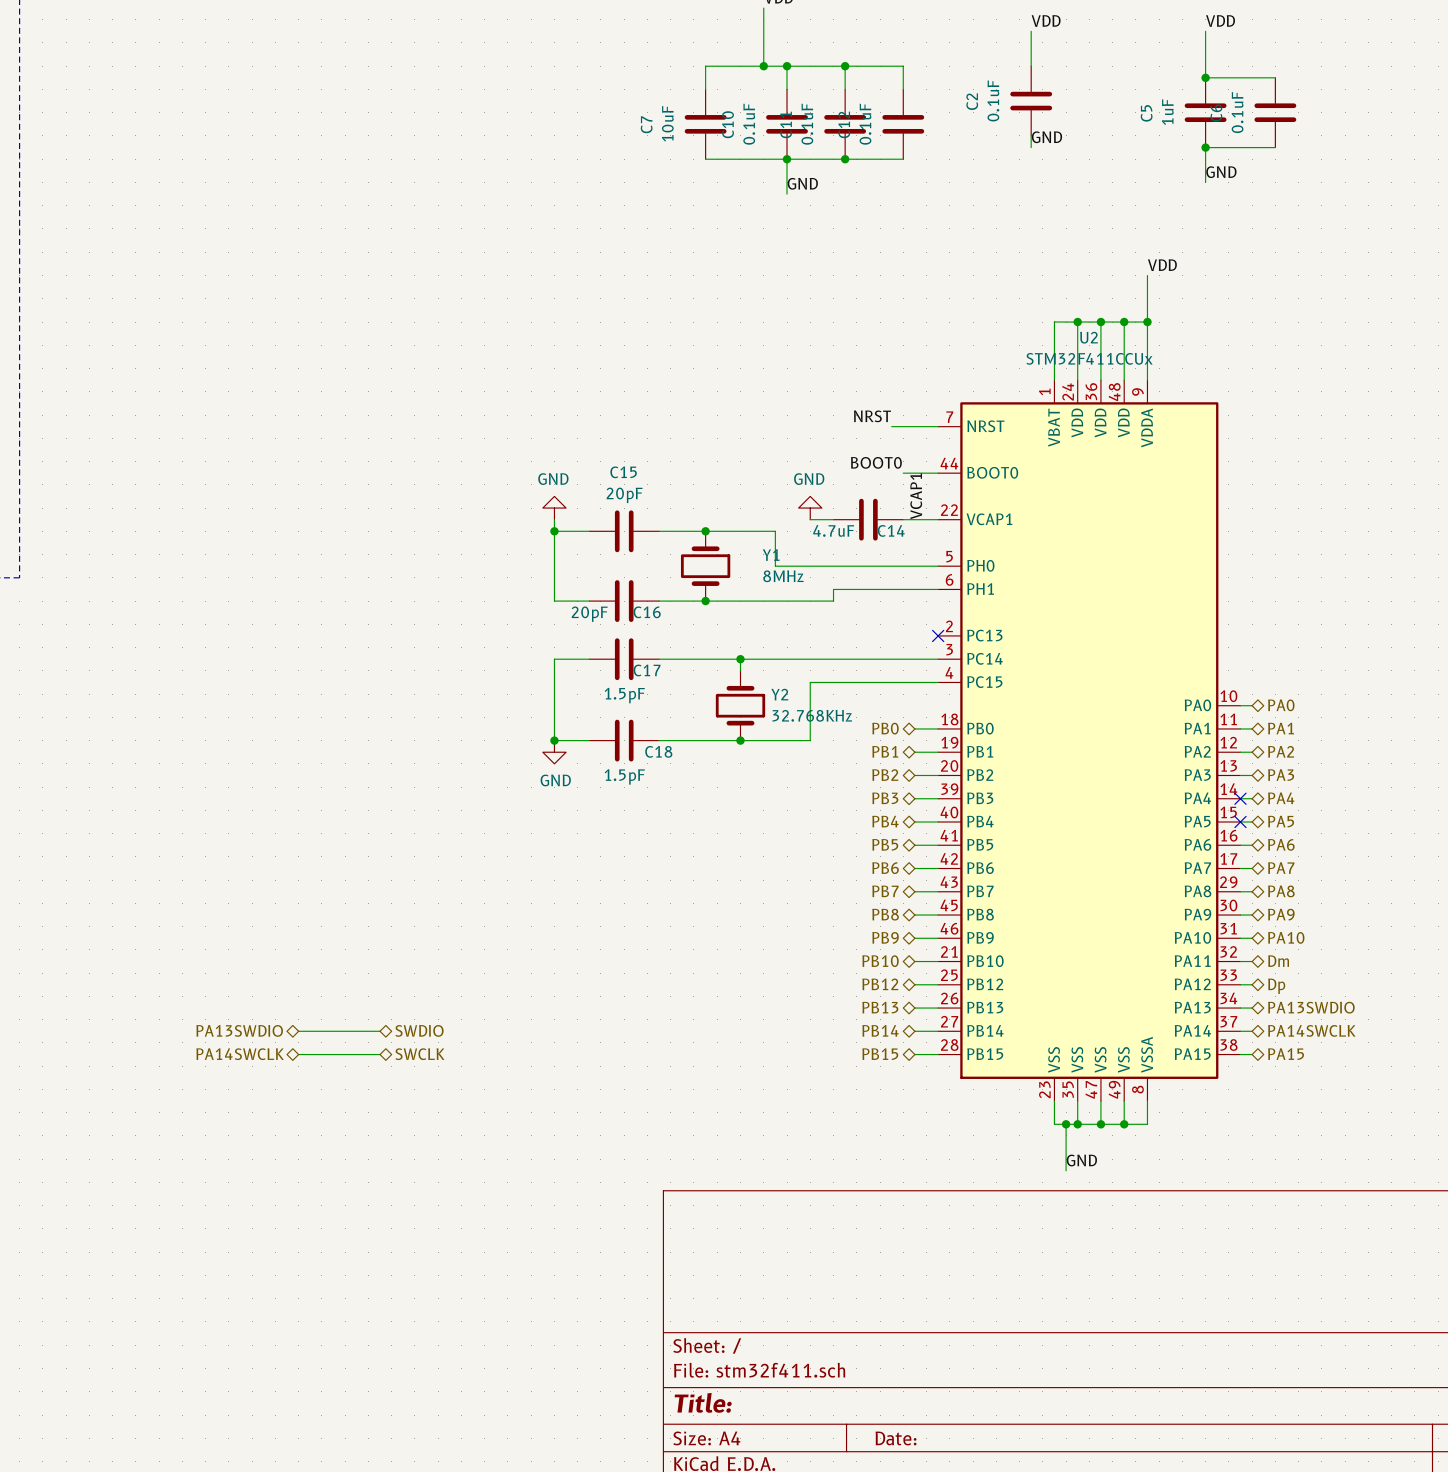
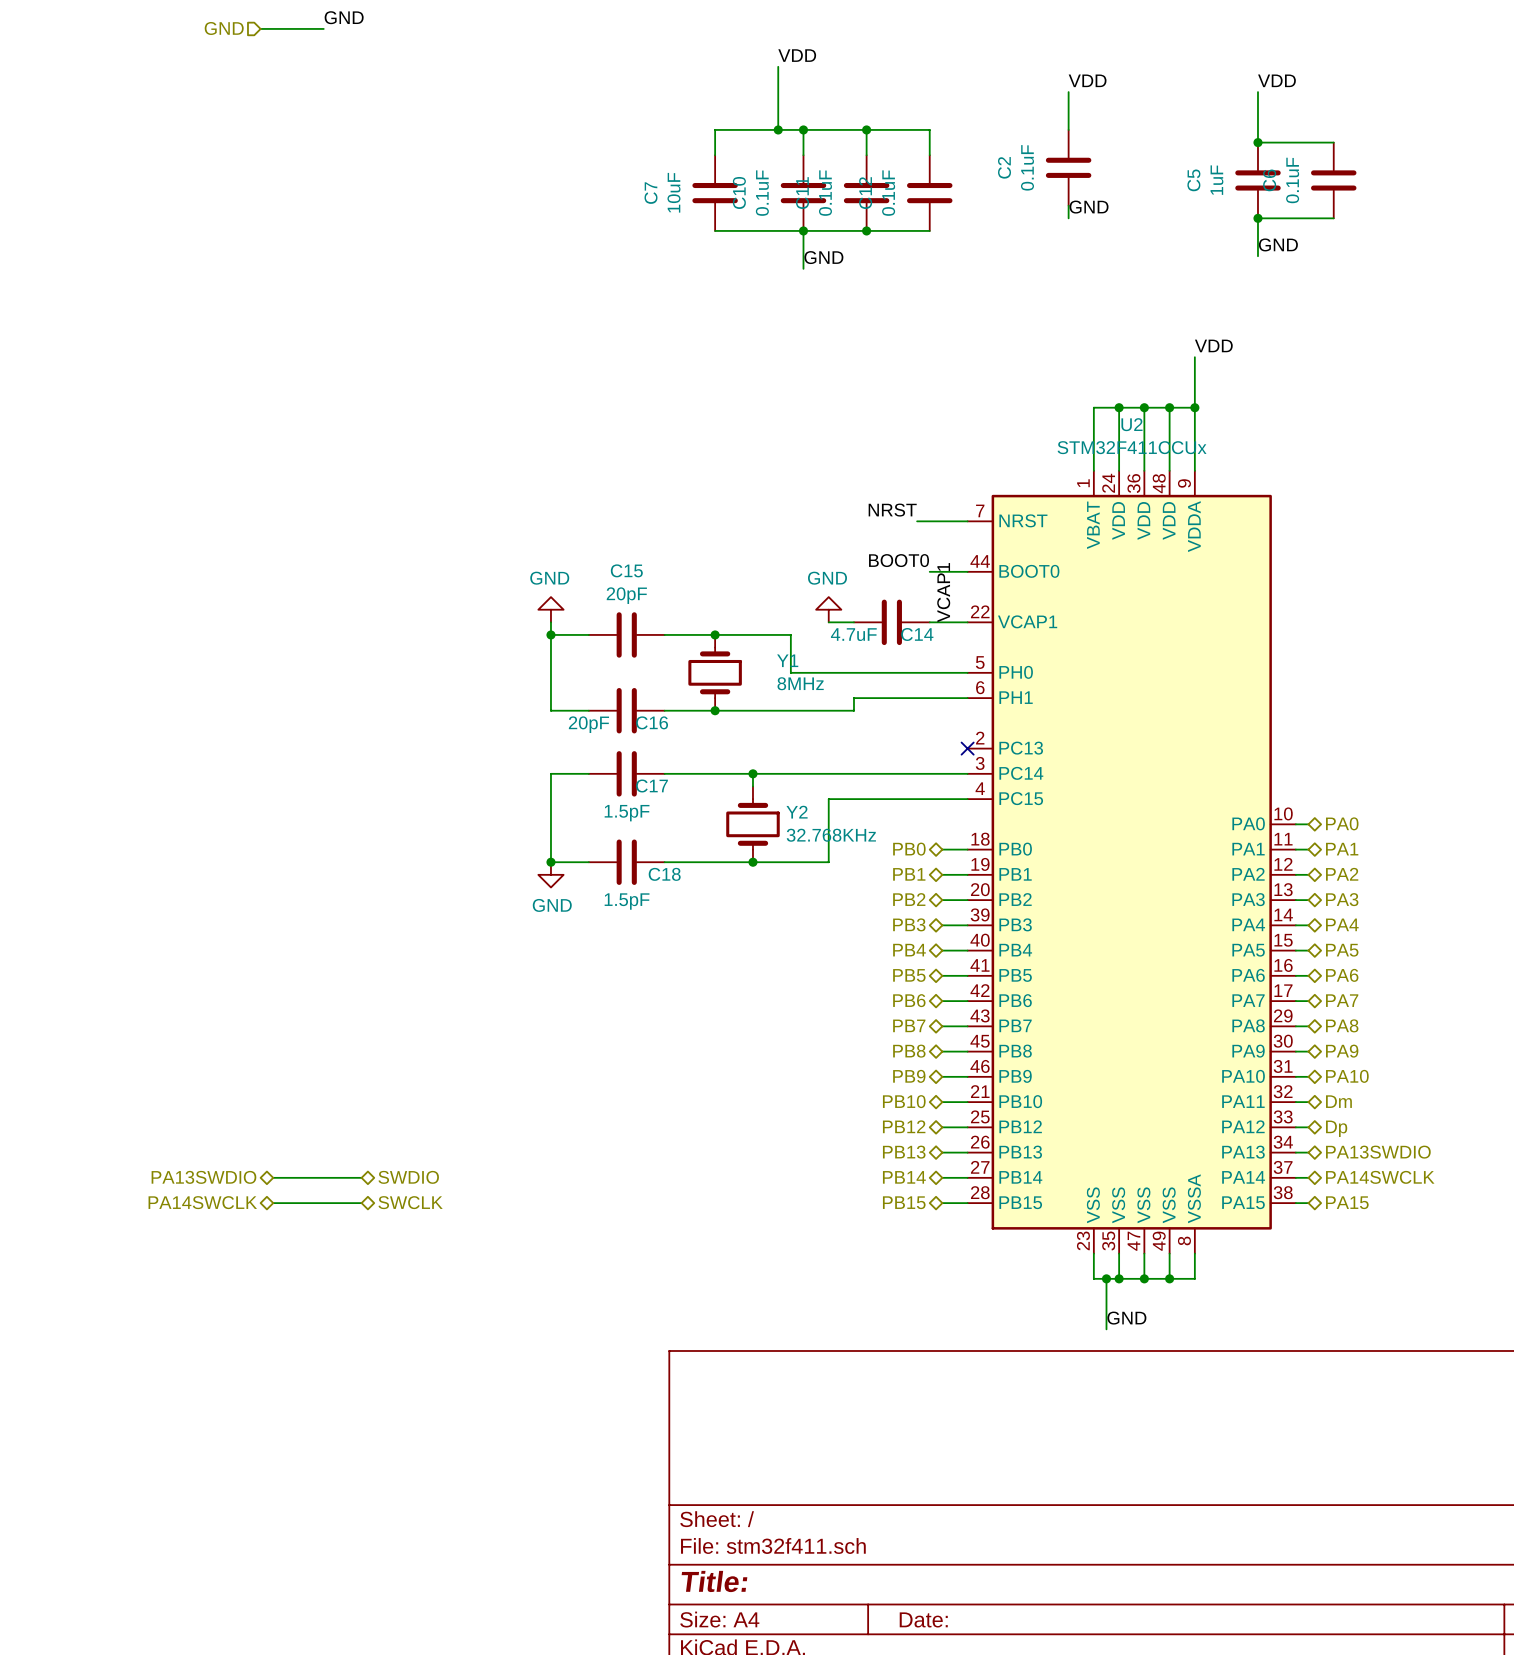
no-connect mark: (1240, 798) -> none
no-connect mark: (1240, 821) -> none

